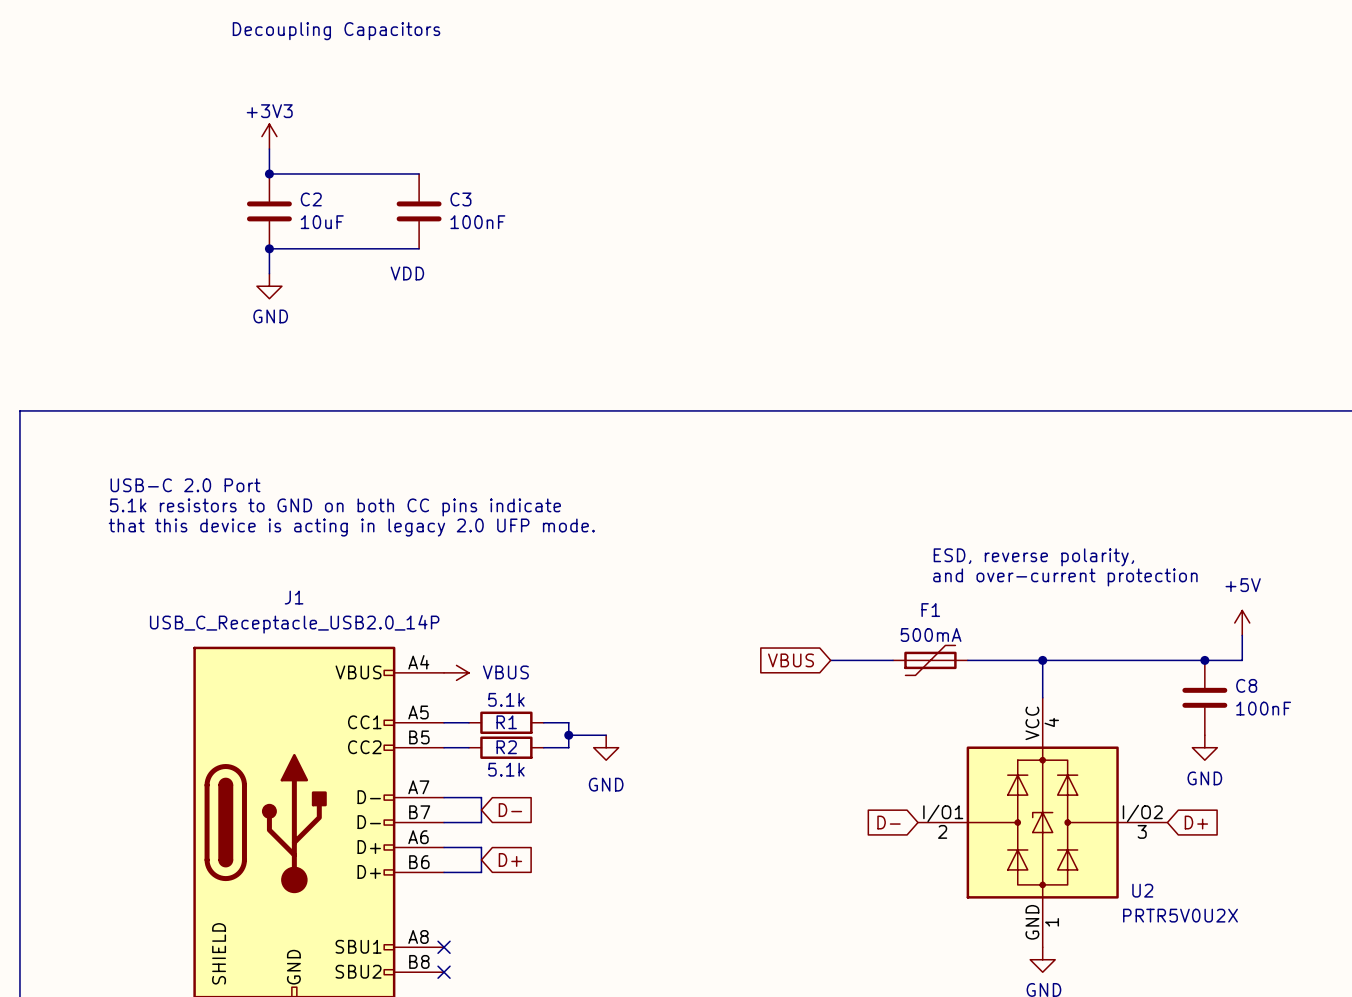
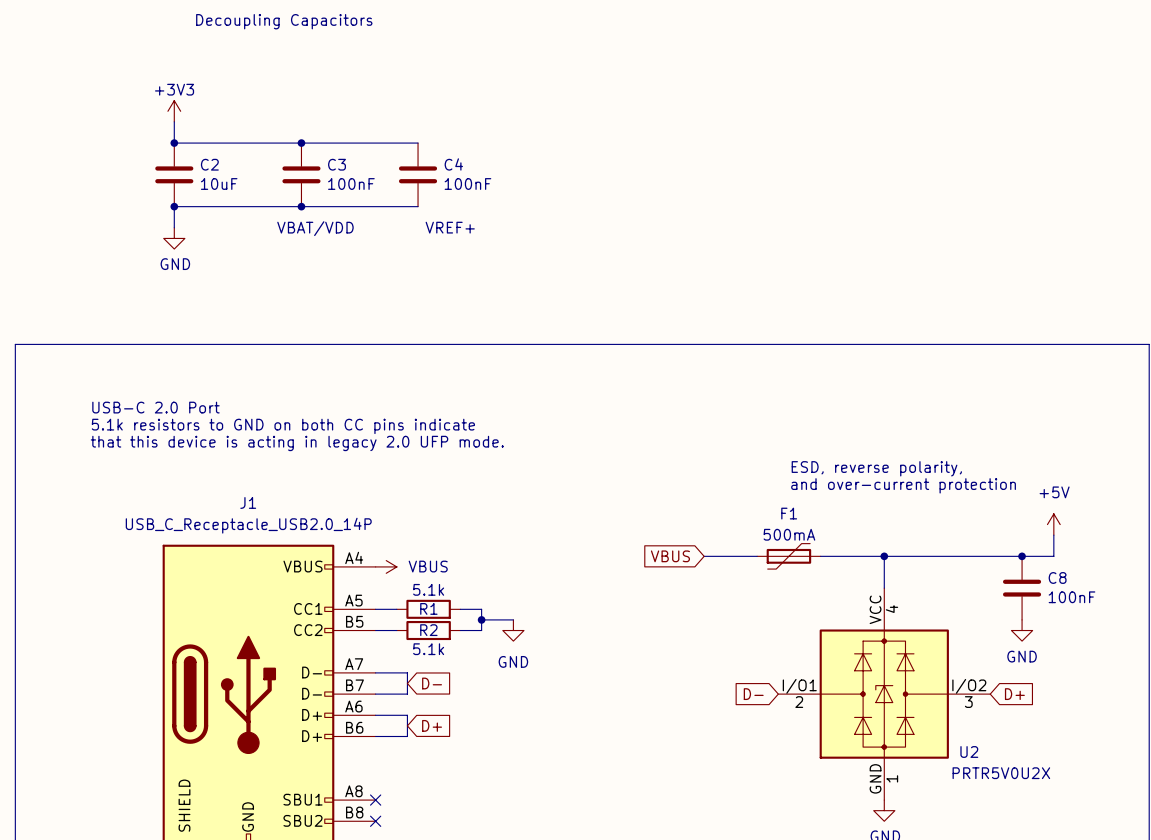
power symbol position: +3V3 (269, 136) -> +3V3 (174, 111)
wire: (269, 149) (269, 173) -> (174, 121) (174, 143) (227, 143)
junction: none -> (174, 143)
junction: (269, 173) -> none
junction: none -> (301, 143)
wire: none -> (354, 143) (418, 143)
C2 position: (269, 211) -> (174, 174)
C3 position: (419, 211) -> (301, 174)
C4: none -> 100nF (418, 174)
junction: none -> (174, 206)
wire: (269, 248) (269, 273) -> (227, 206) (174, 206) (174, 227)
junction: (269, 248) -> none
junction: none -> (301, 206)
wire: none -> (354, 206) (418, 206)
text: VDD (407, 273) -> none
text: none -> VREF+ (450, 227)
text: none -> VBAT/VDD (315, 228)
power symbol position: GND (269, 286) -> GND (174, 238)

